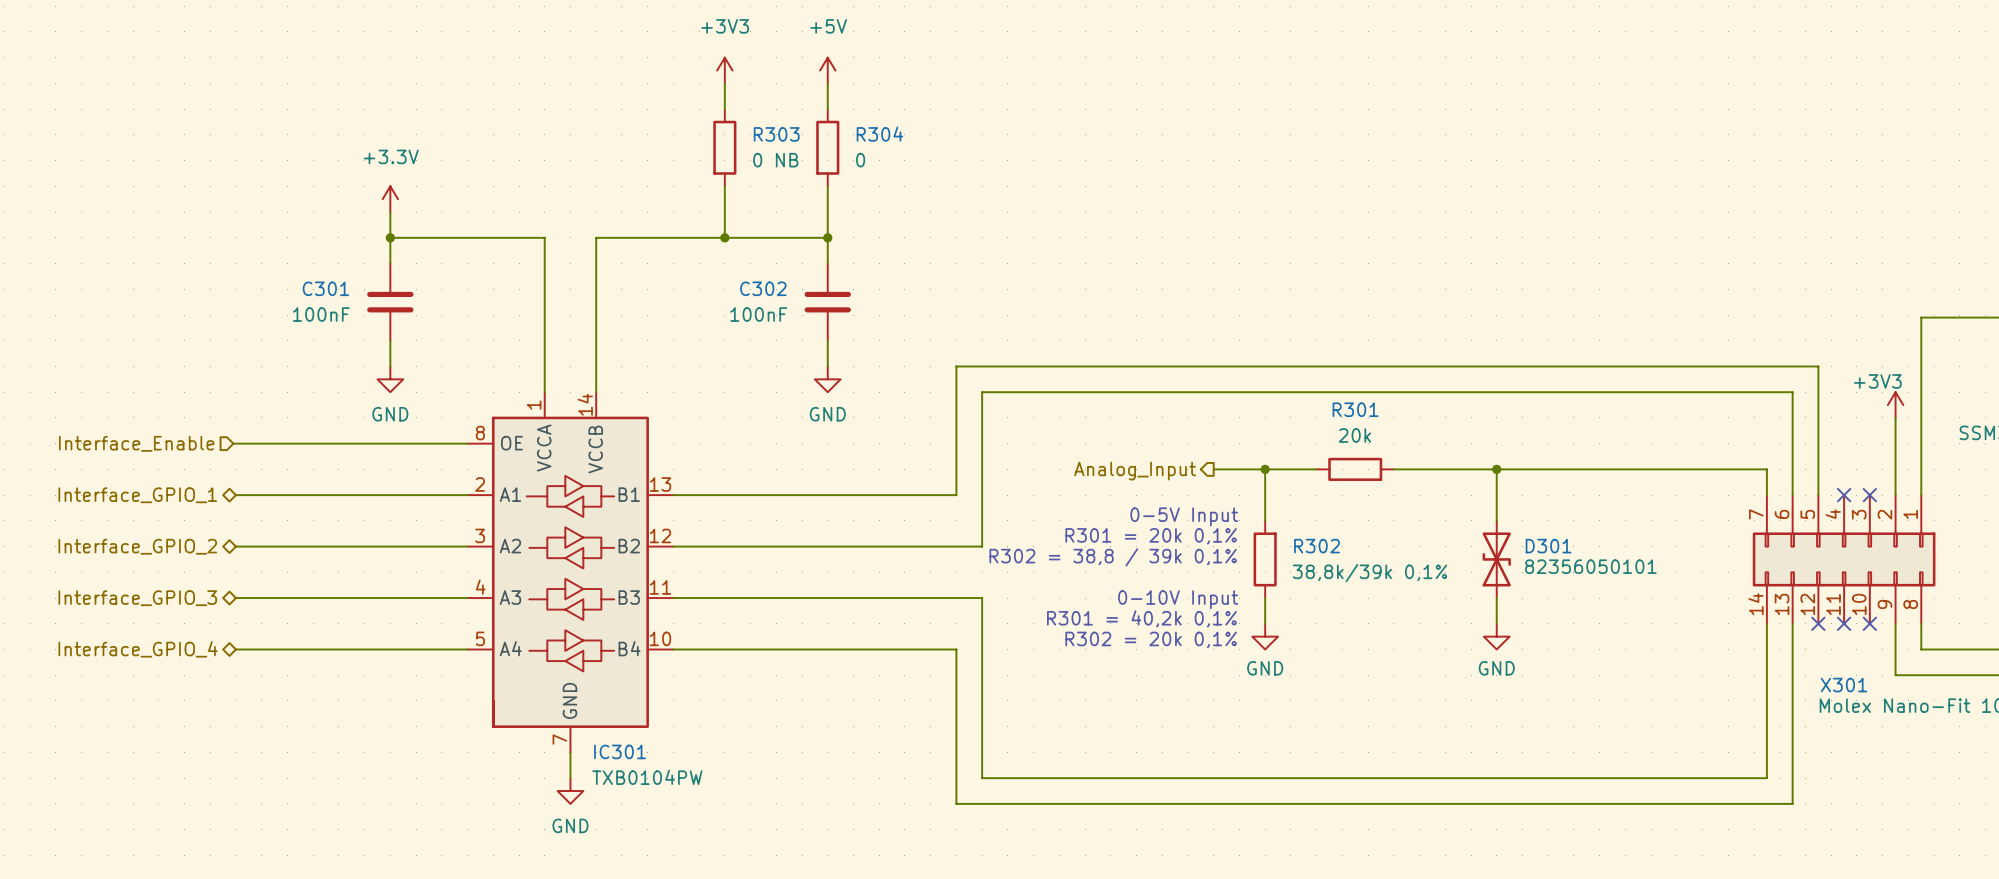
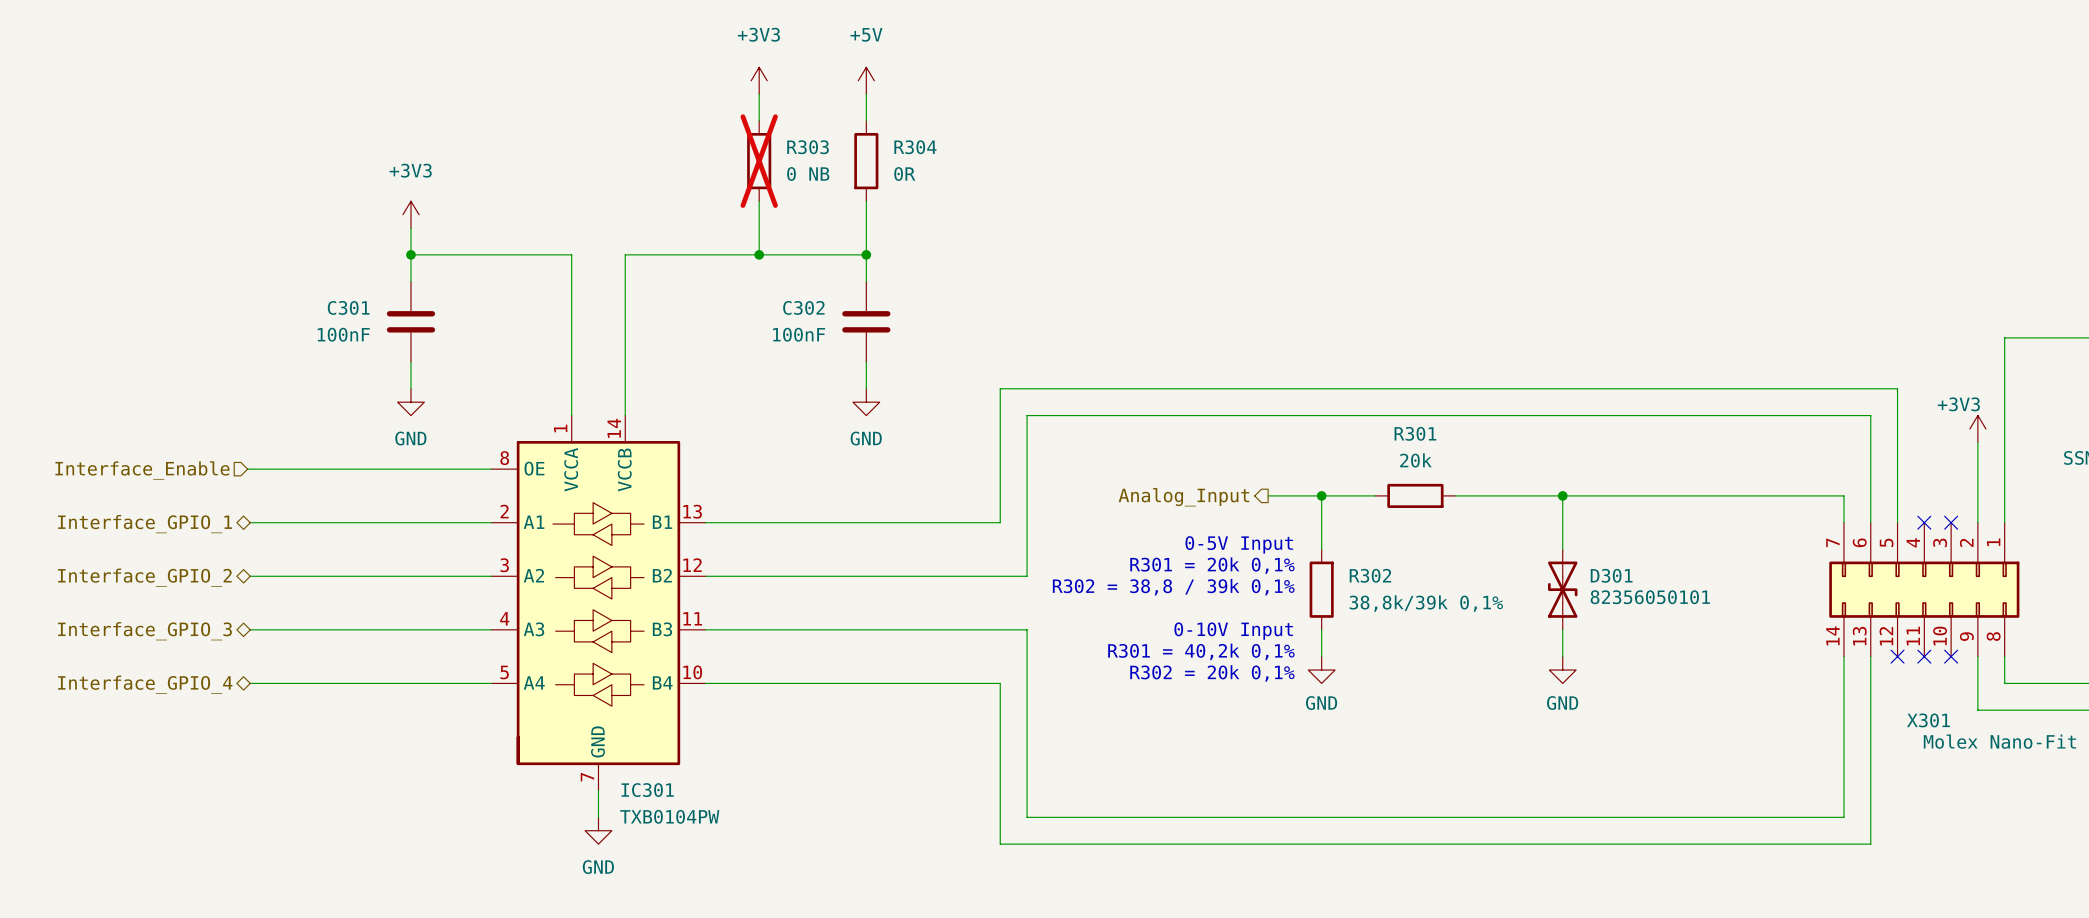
R303 do-not-place cross: none -> (759, 161)
R304 value: 0 (860, 160) -> 0R (904, 174)
power symbol: +3.3V (390, 199) -> +3V3 (410, 214)

